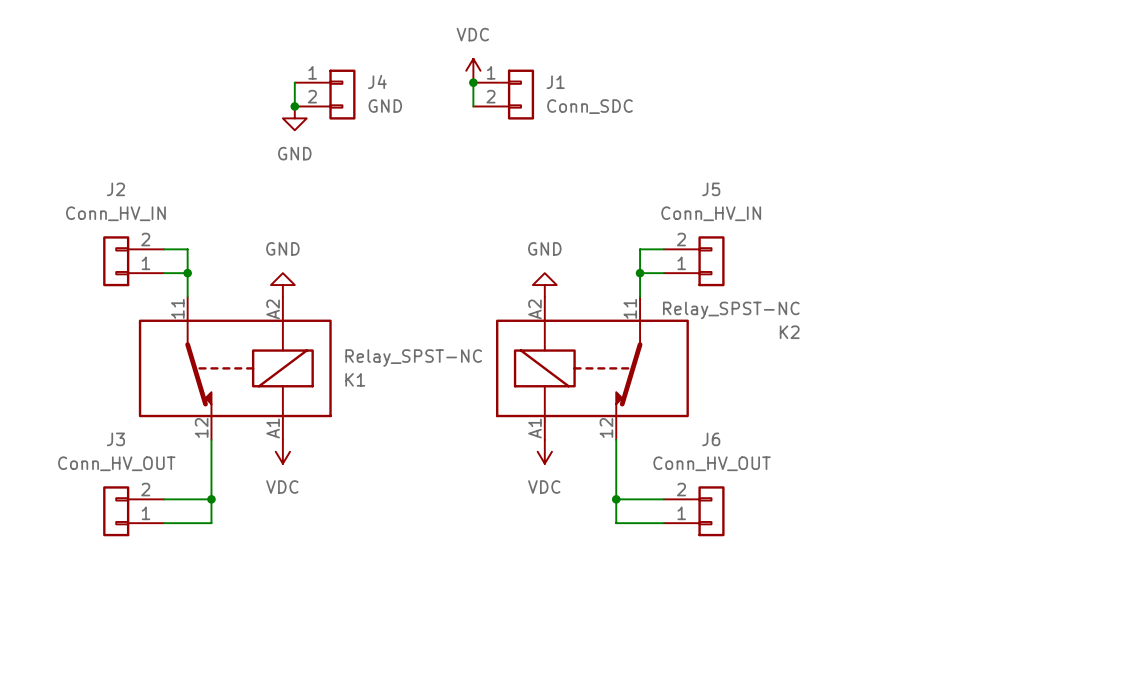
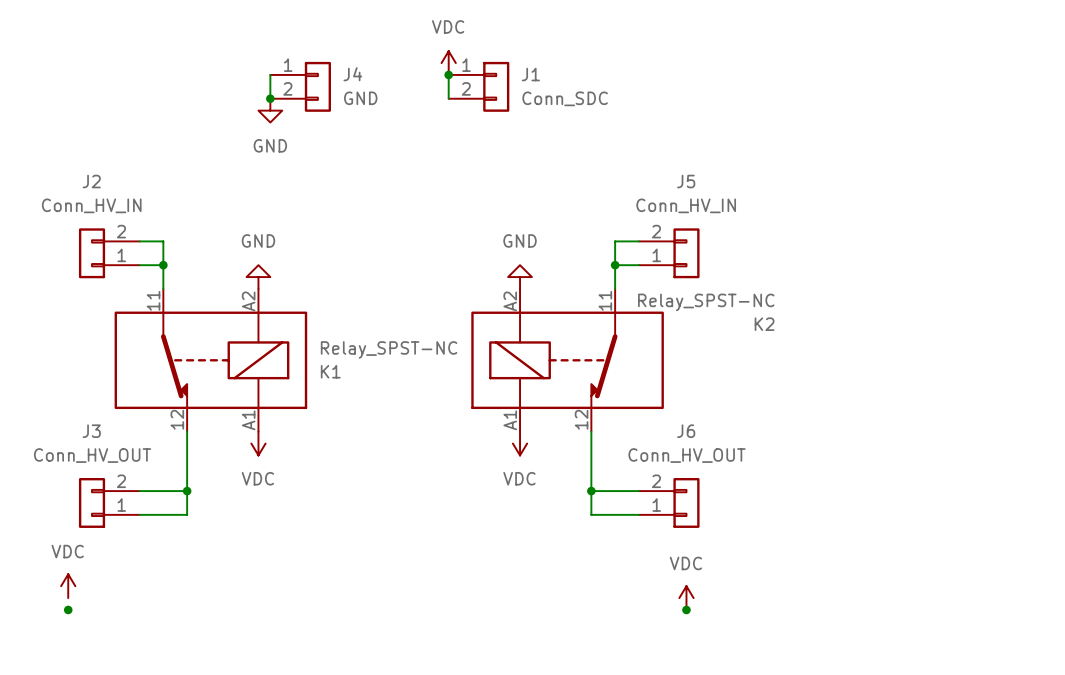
power symbol: none -> VDC (68, 586)
power symbol: none -> VDC (686, 598)
junction: none -> (68, 609)
junction: none -> (686, 609)

